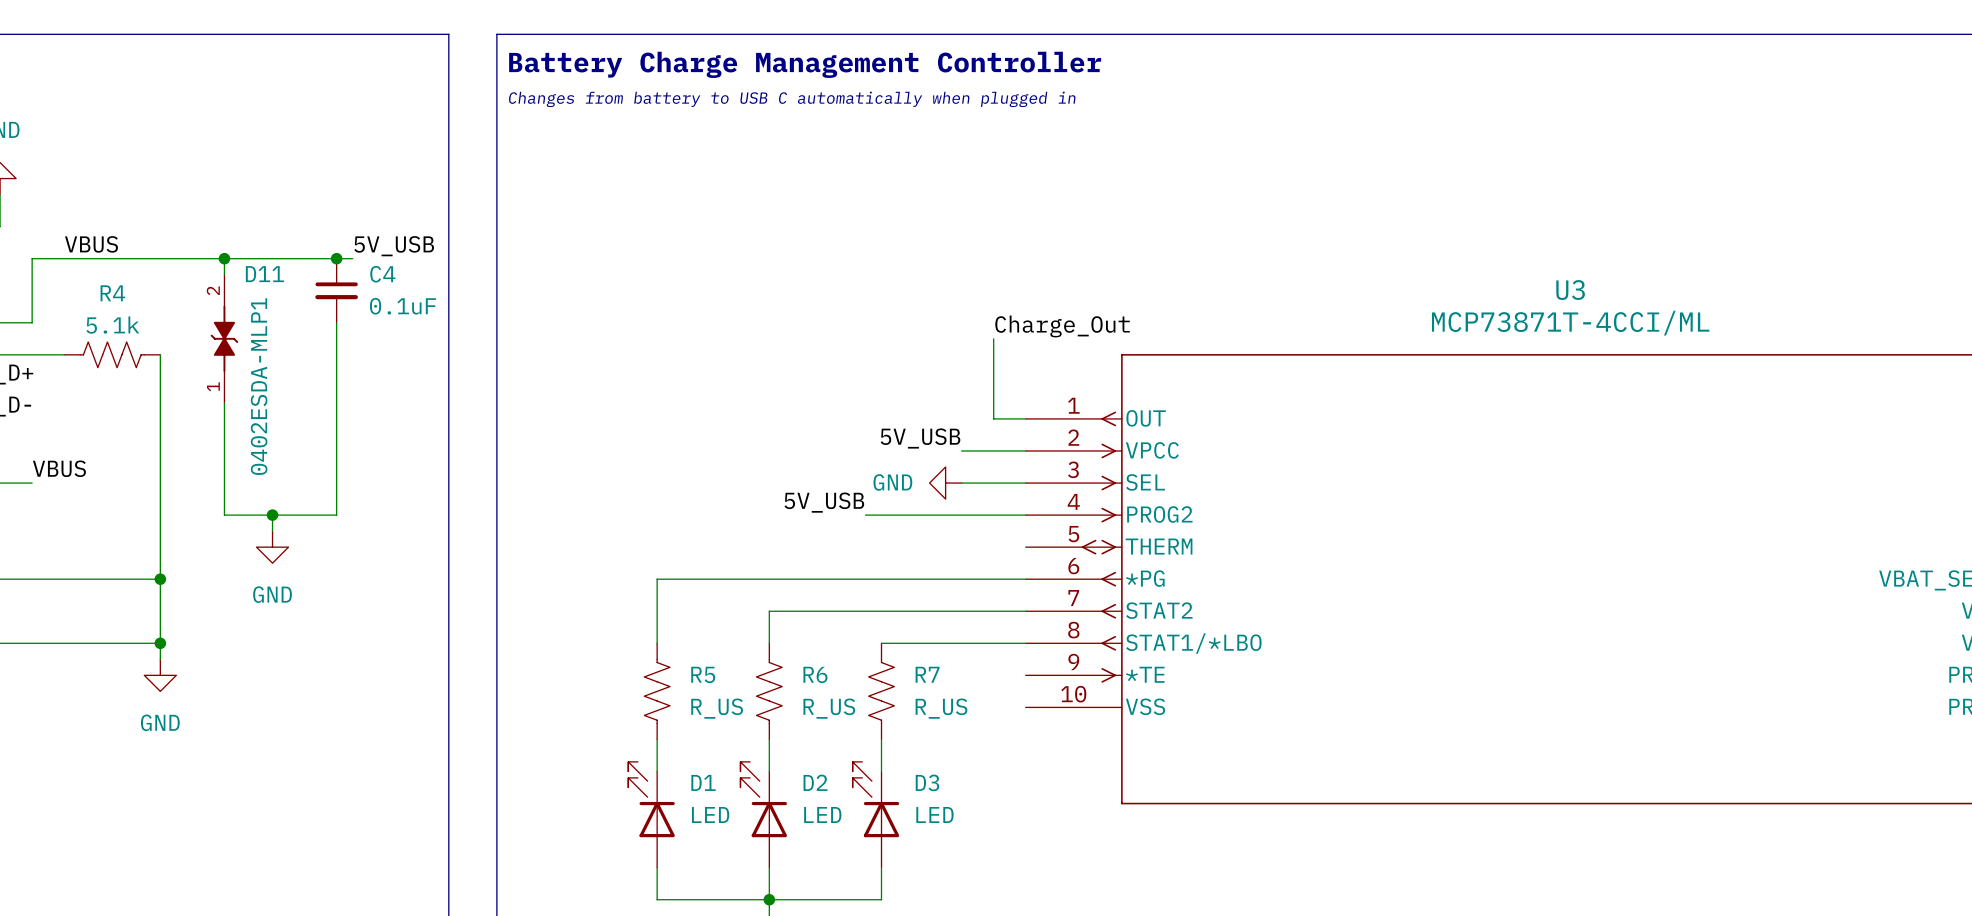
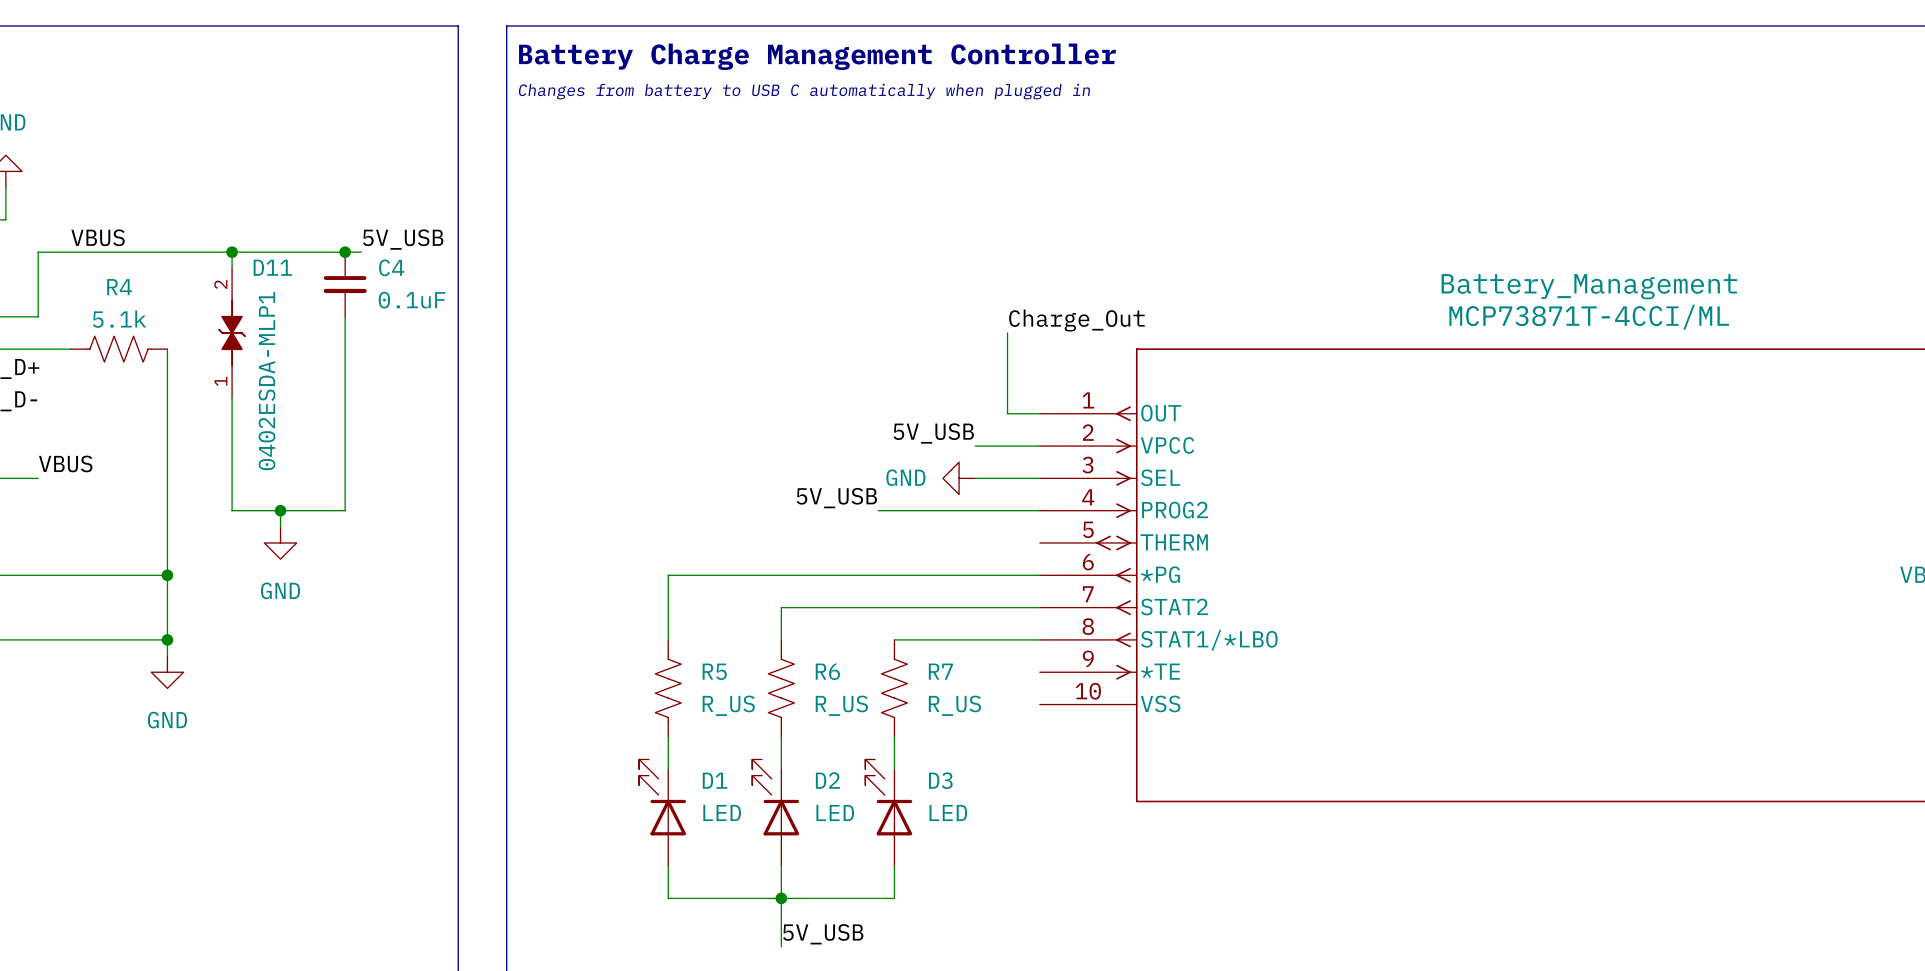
U3 name: U3 (1570, 290) -> Battery_Management (1589, 286)

